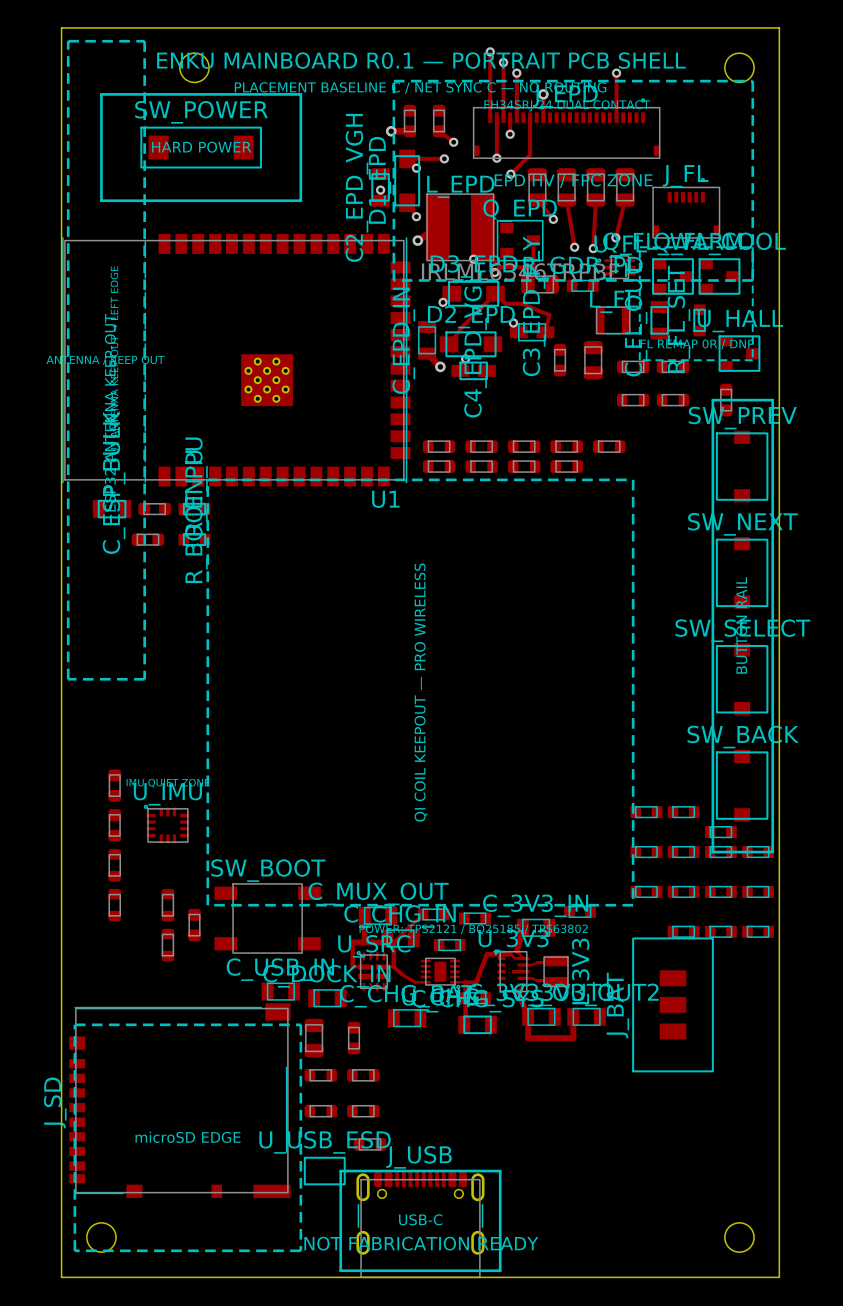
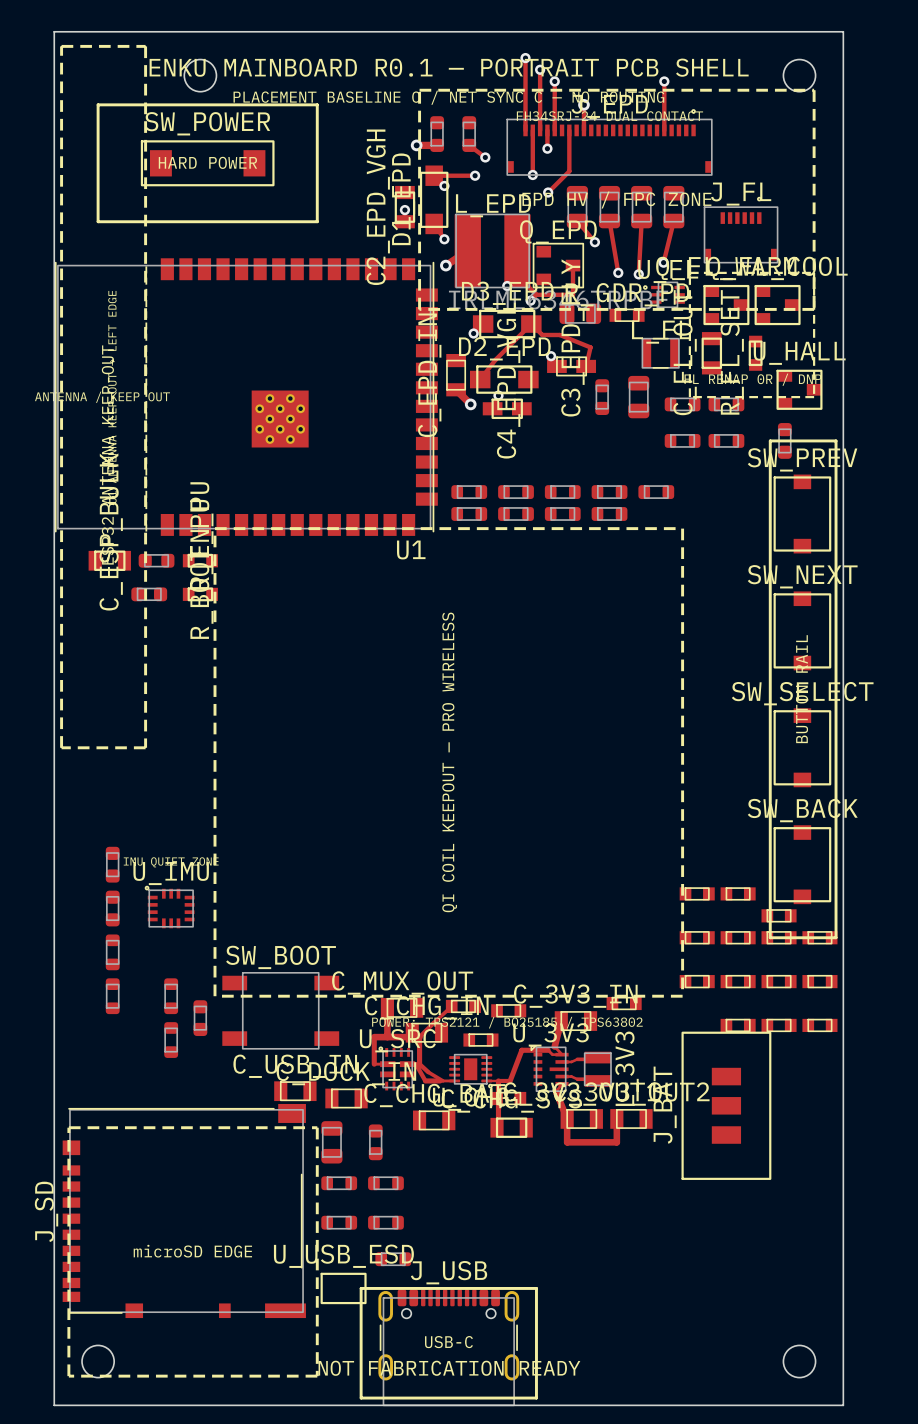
track: none -> (407, 1064) (415, 1064) (425, 1080) (454, 1080)

